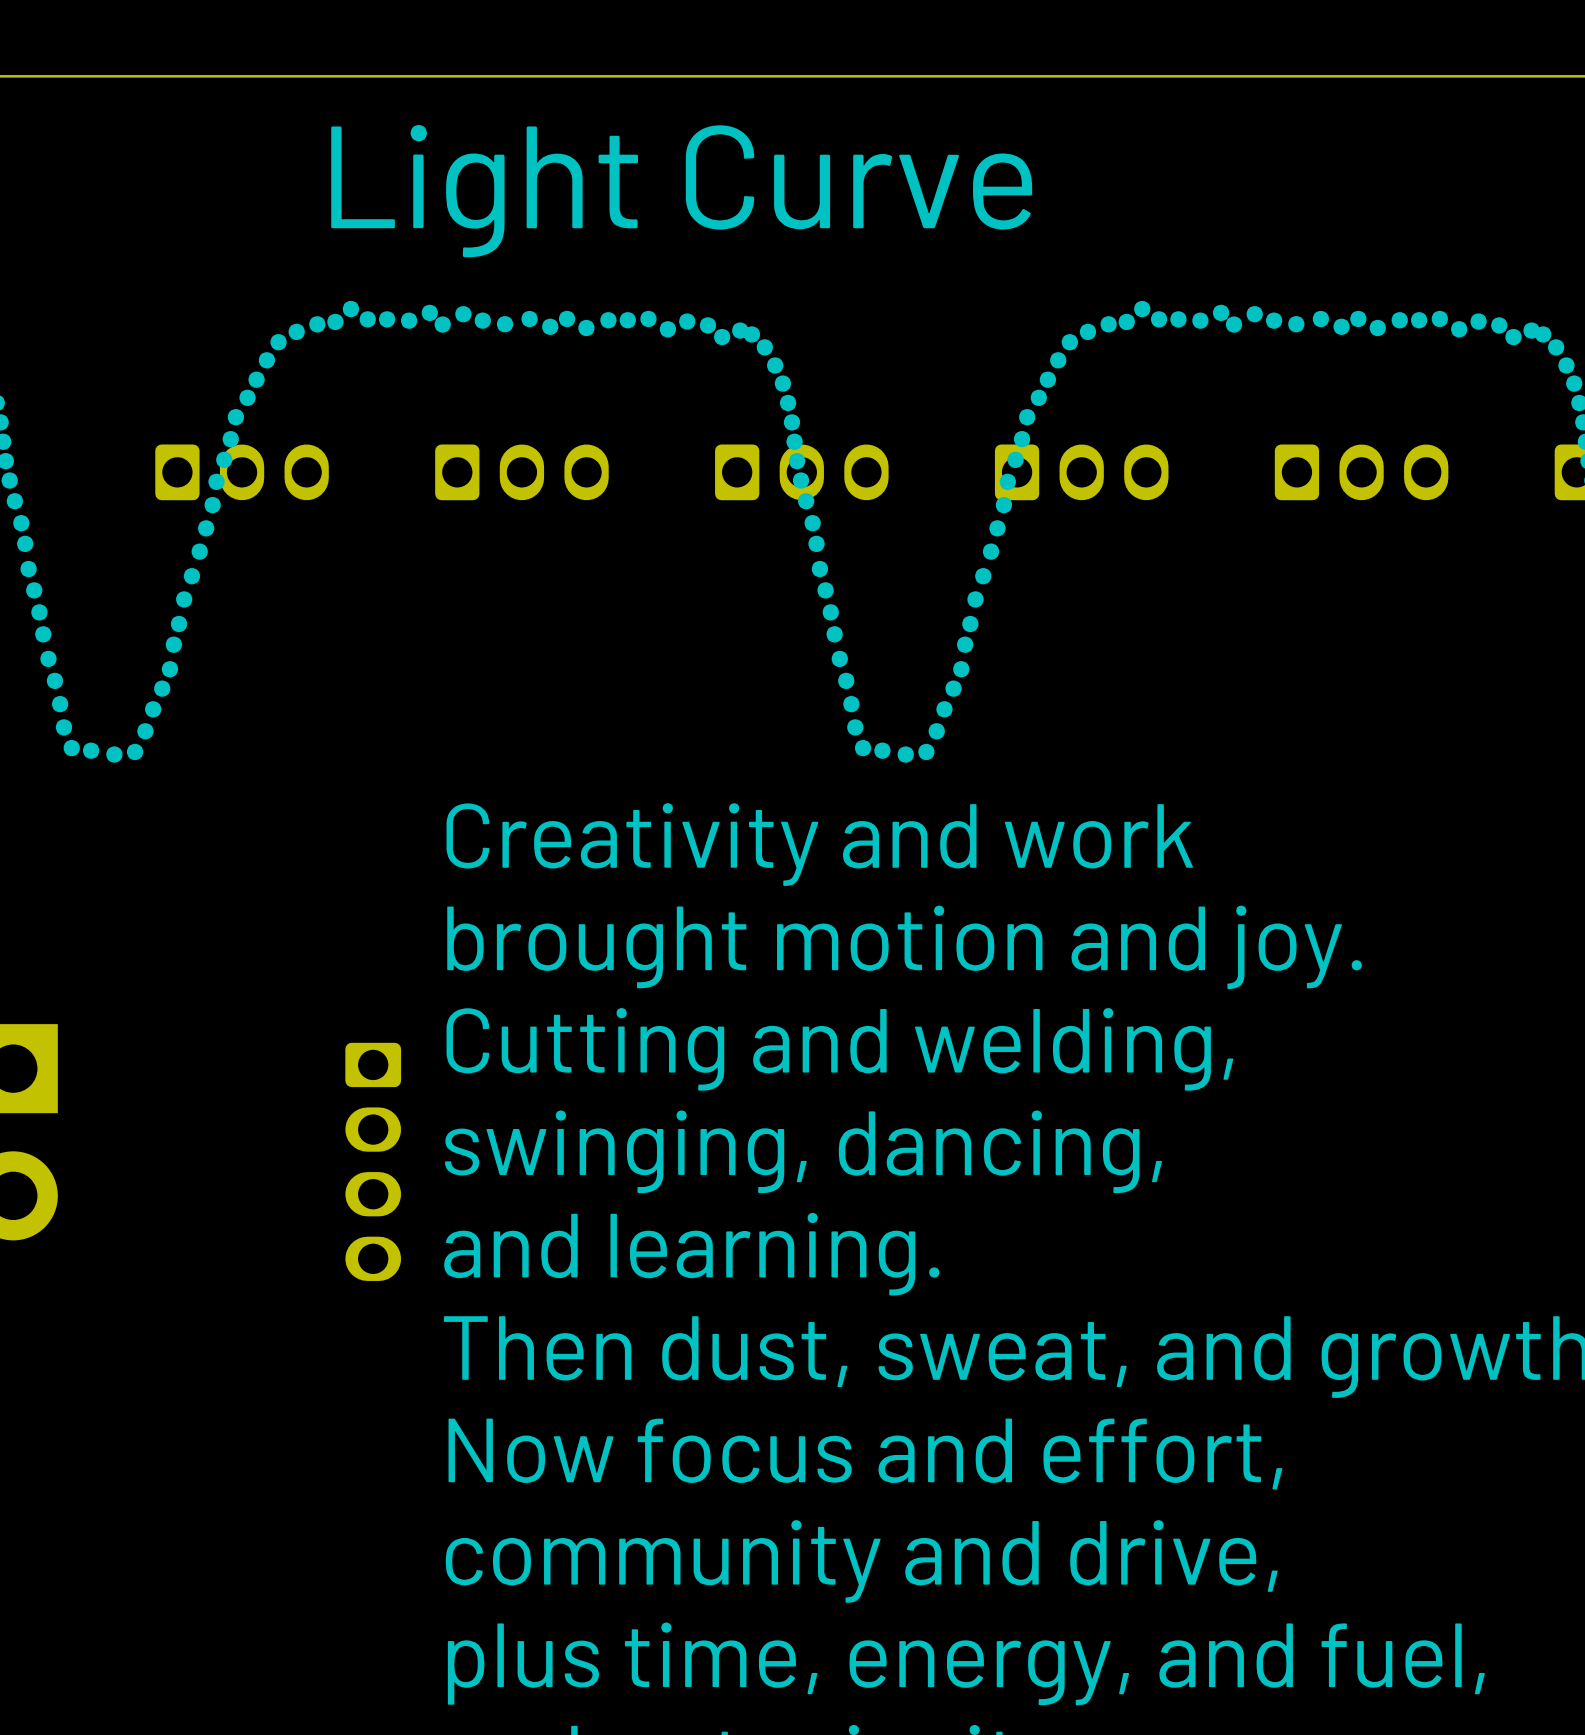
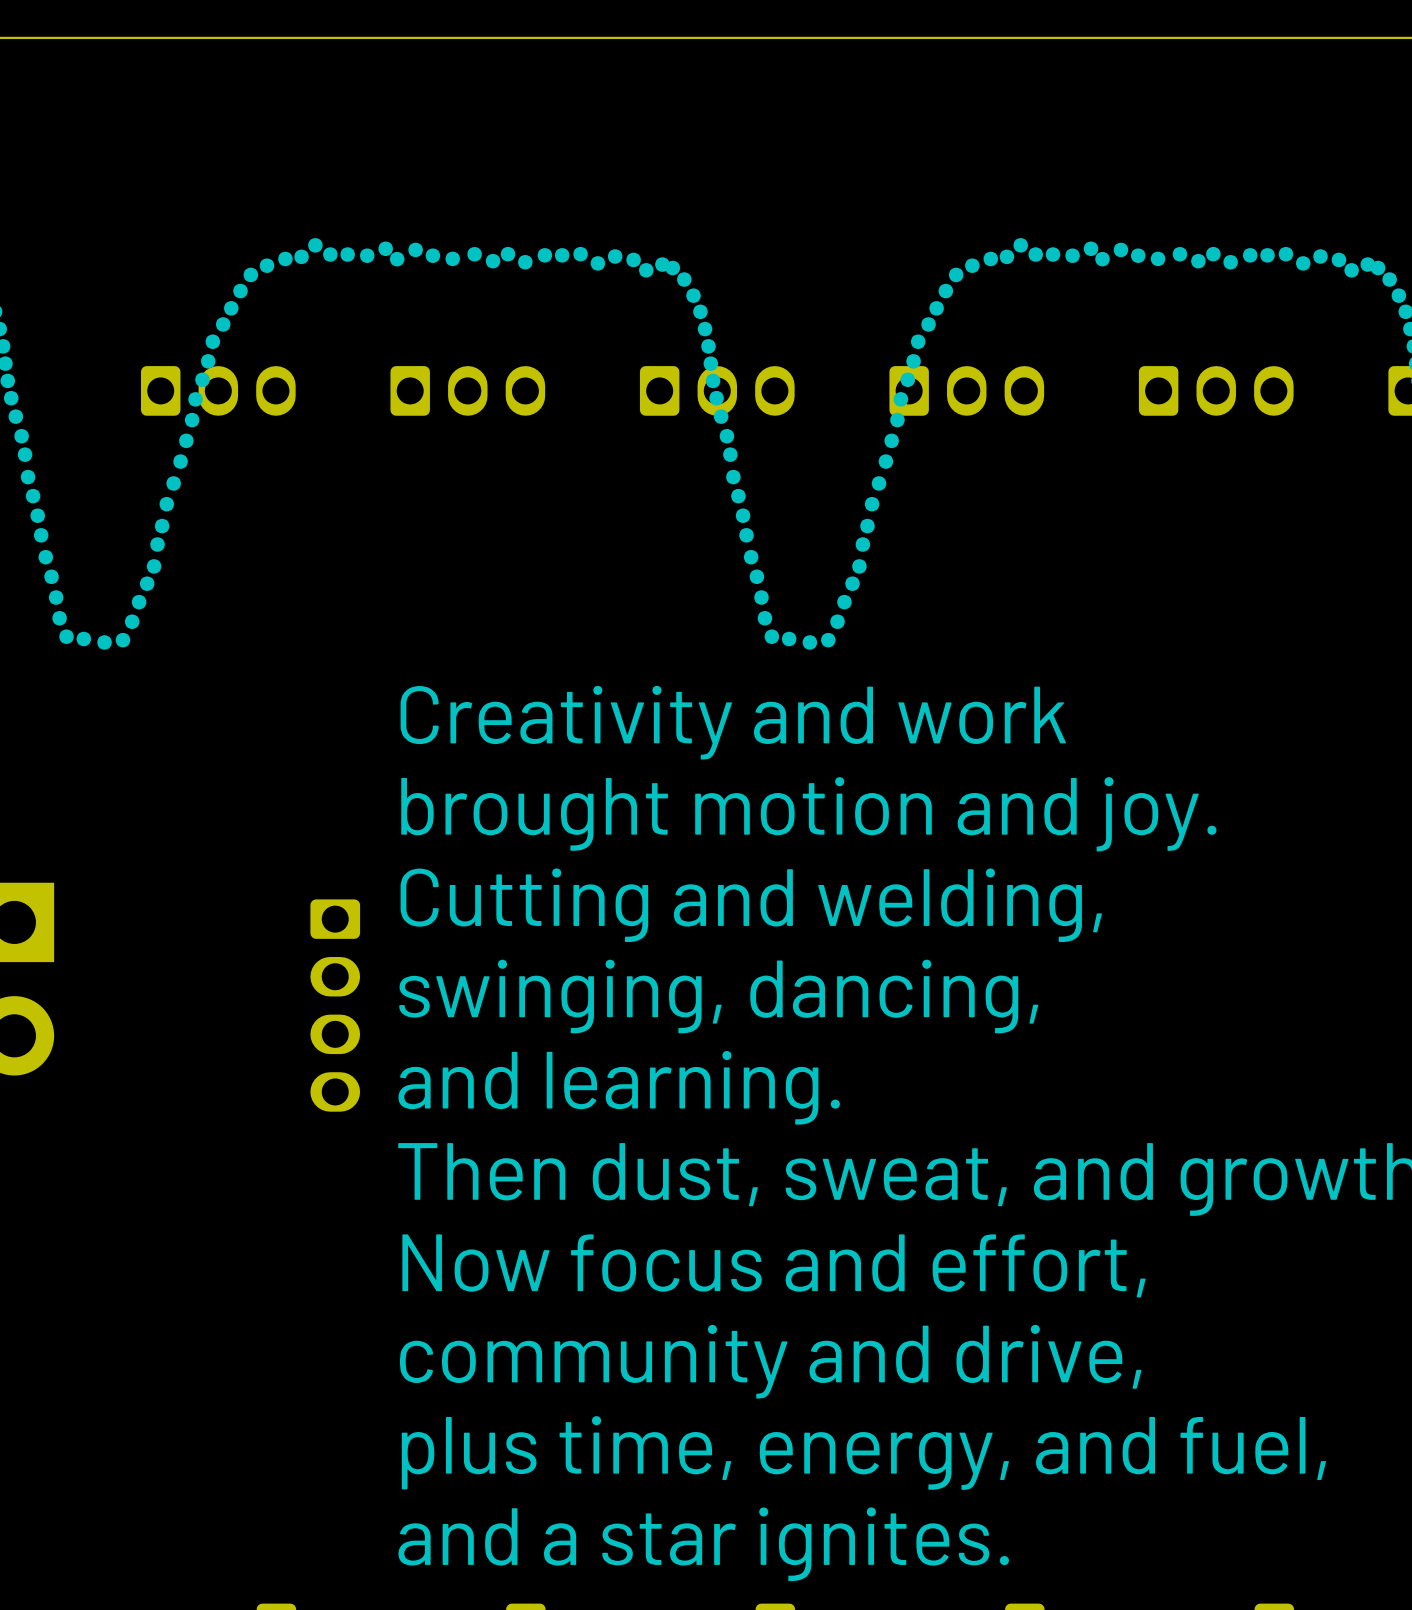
text: Light Curve (681, 191) -> none

